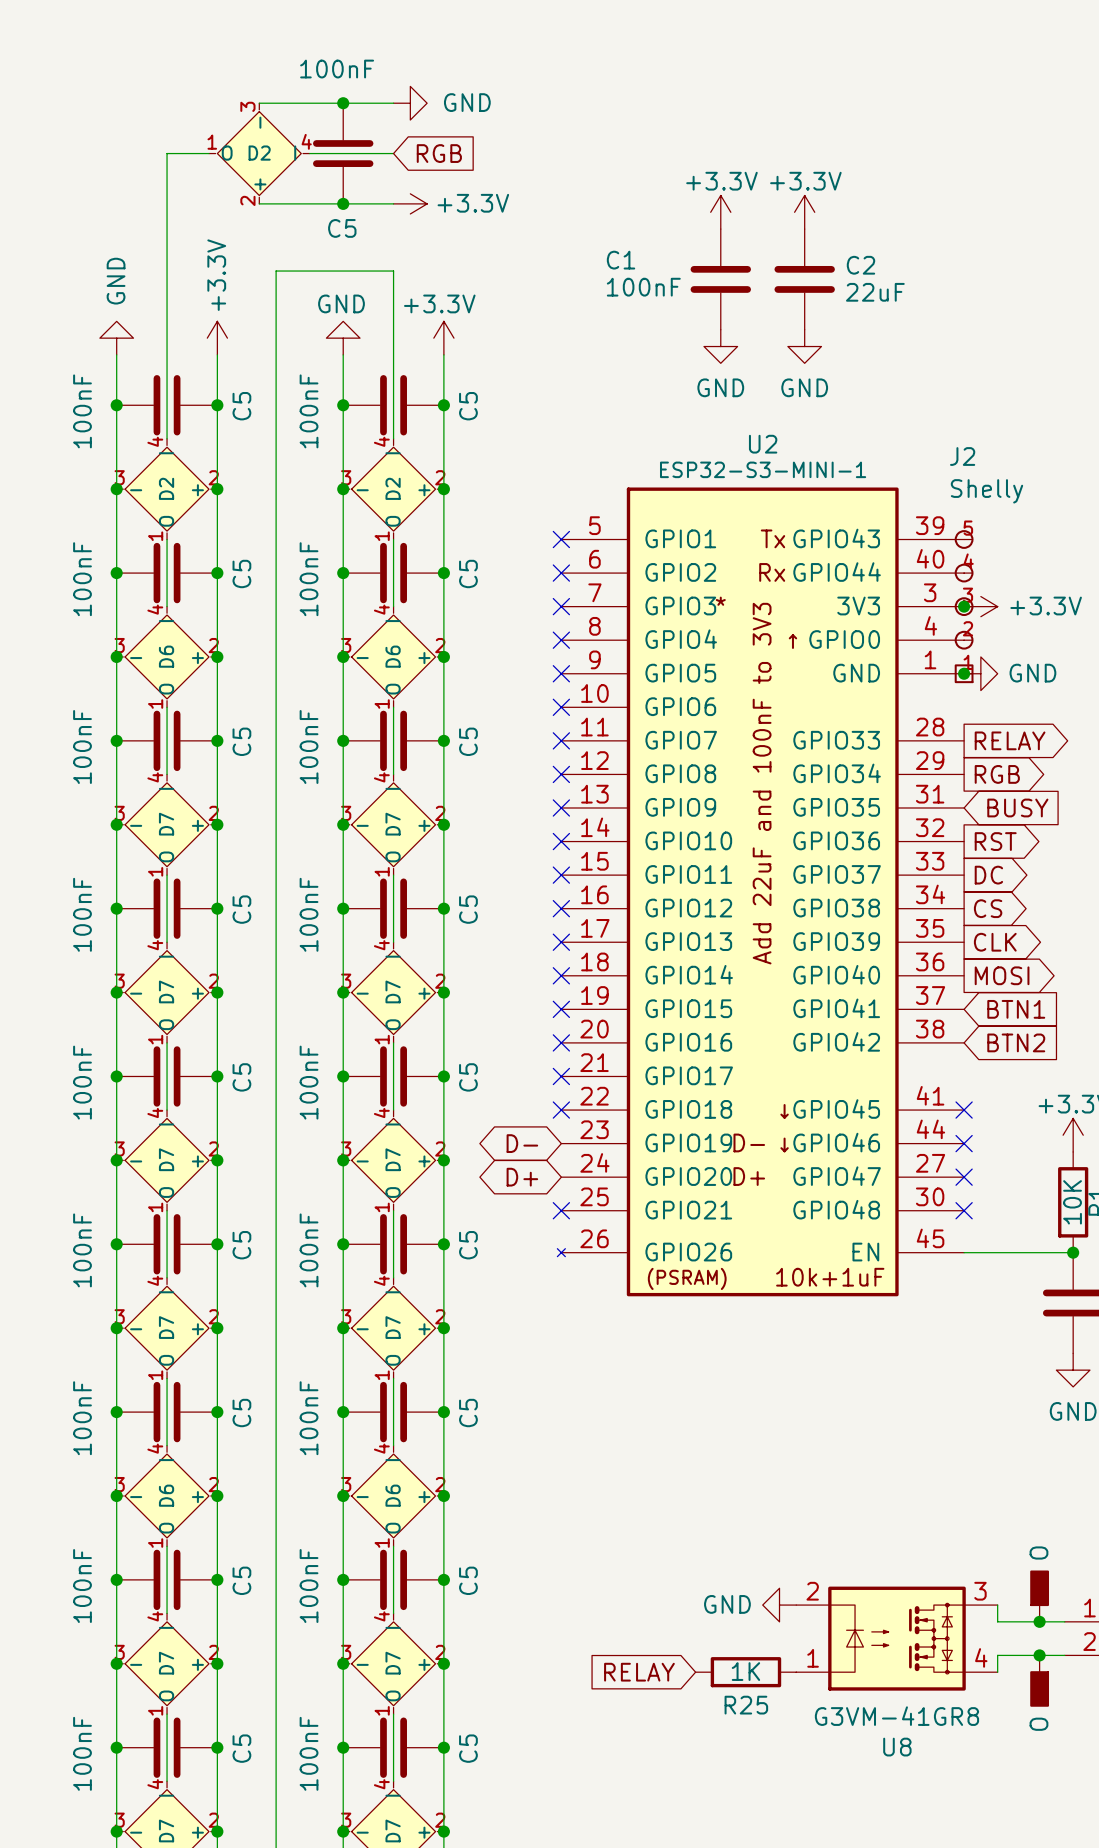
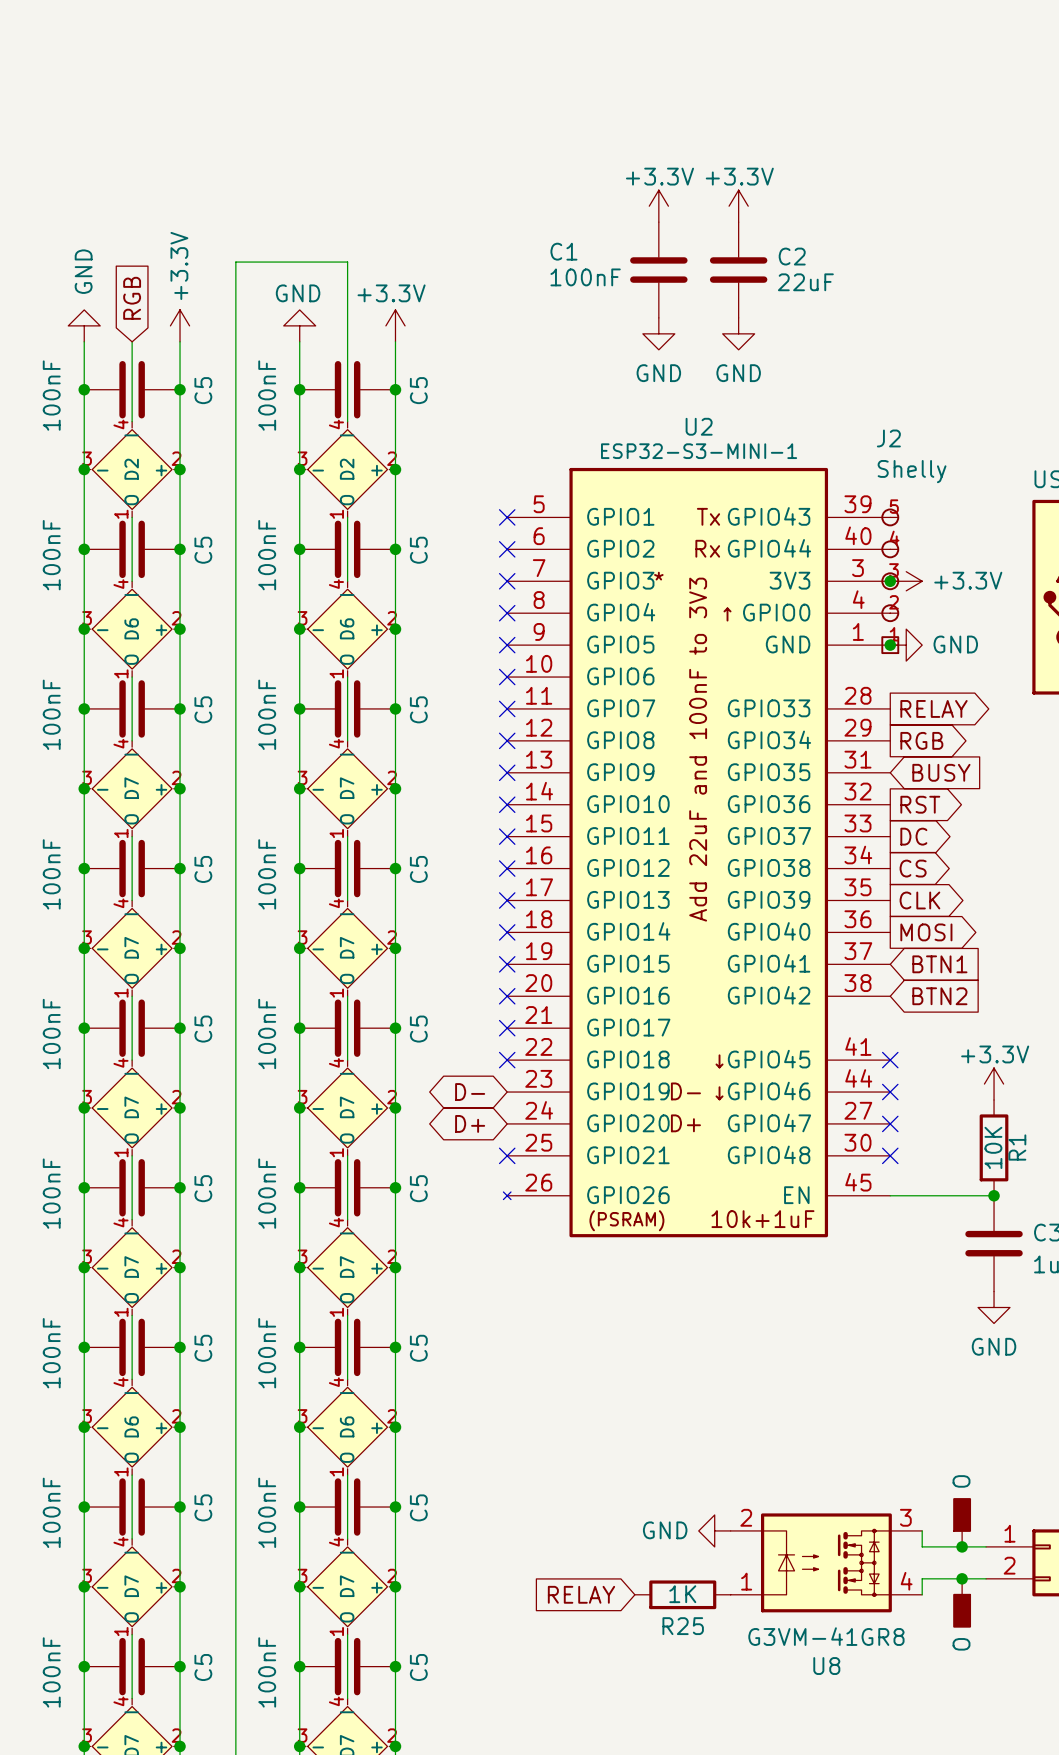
wire: (259, 103) (393, 103) -> none
junction: (343, 103) -> none
power symbol: GND (410, 103) -> none
wire: (208, 153) (167, 153) (167, 354) -> none
D2: (259, 153) -> none
wire: (309, 153) (393, 153) -> none
C5: 100nF (343, 153) -> none
global label rotation: 0° (439, 153) -> 90° counterclockwise (132, 298)
global label position: RGB (439, 153) -> RGB (132, 298)
wire: (259, 203) (393, 203) -> none
junction: (343, 203) -> none
power symbol: +3.3V (410, 203) -> none

